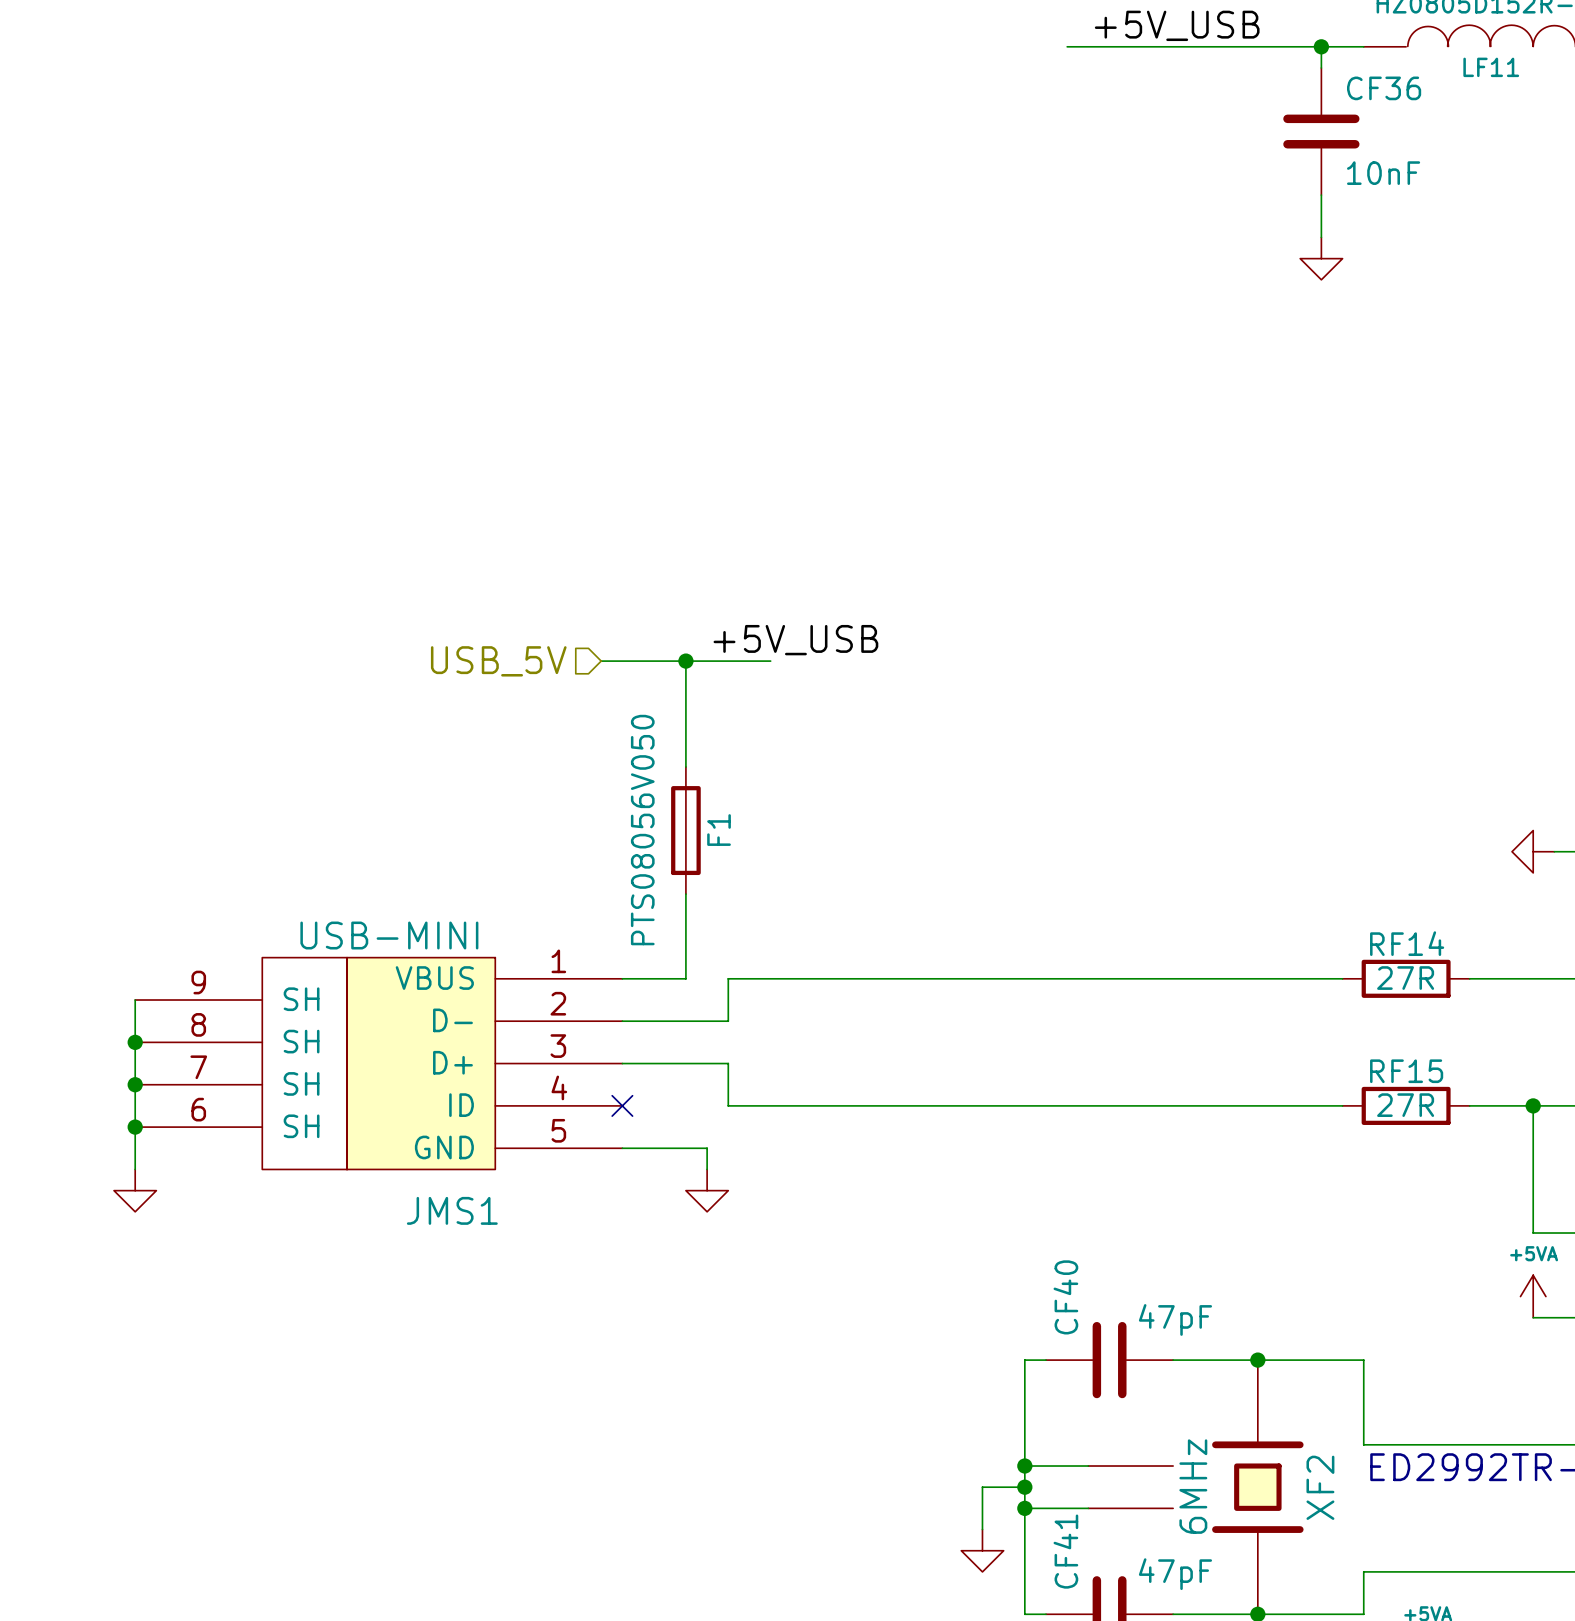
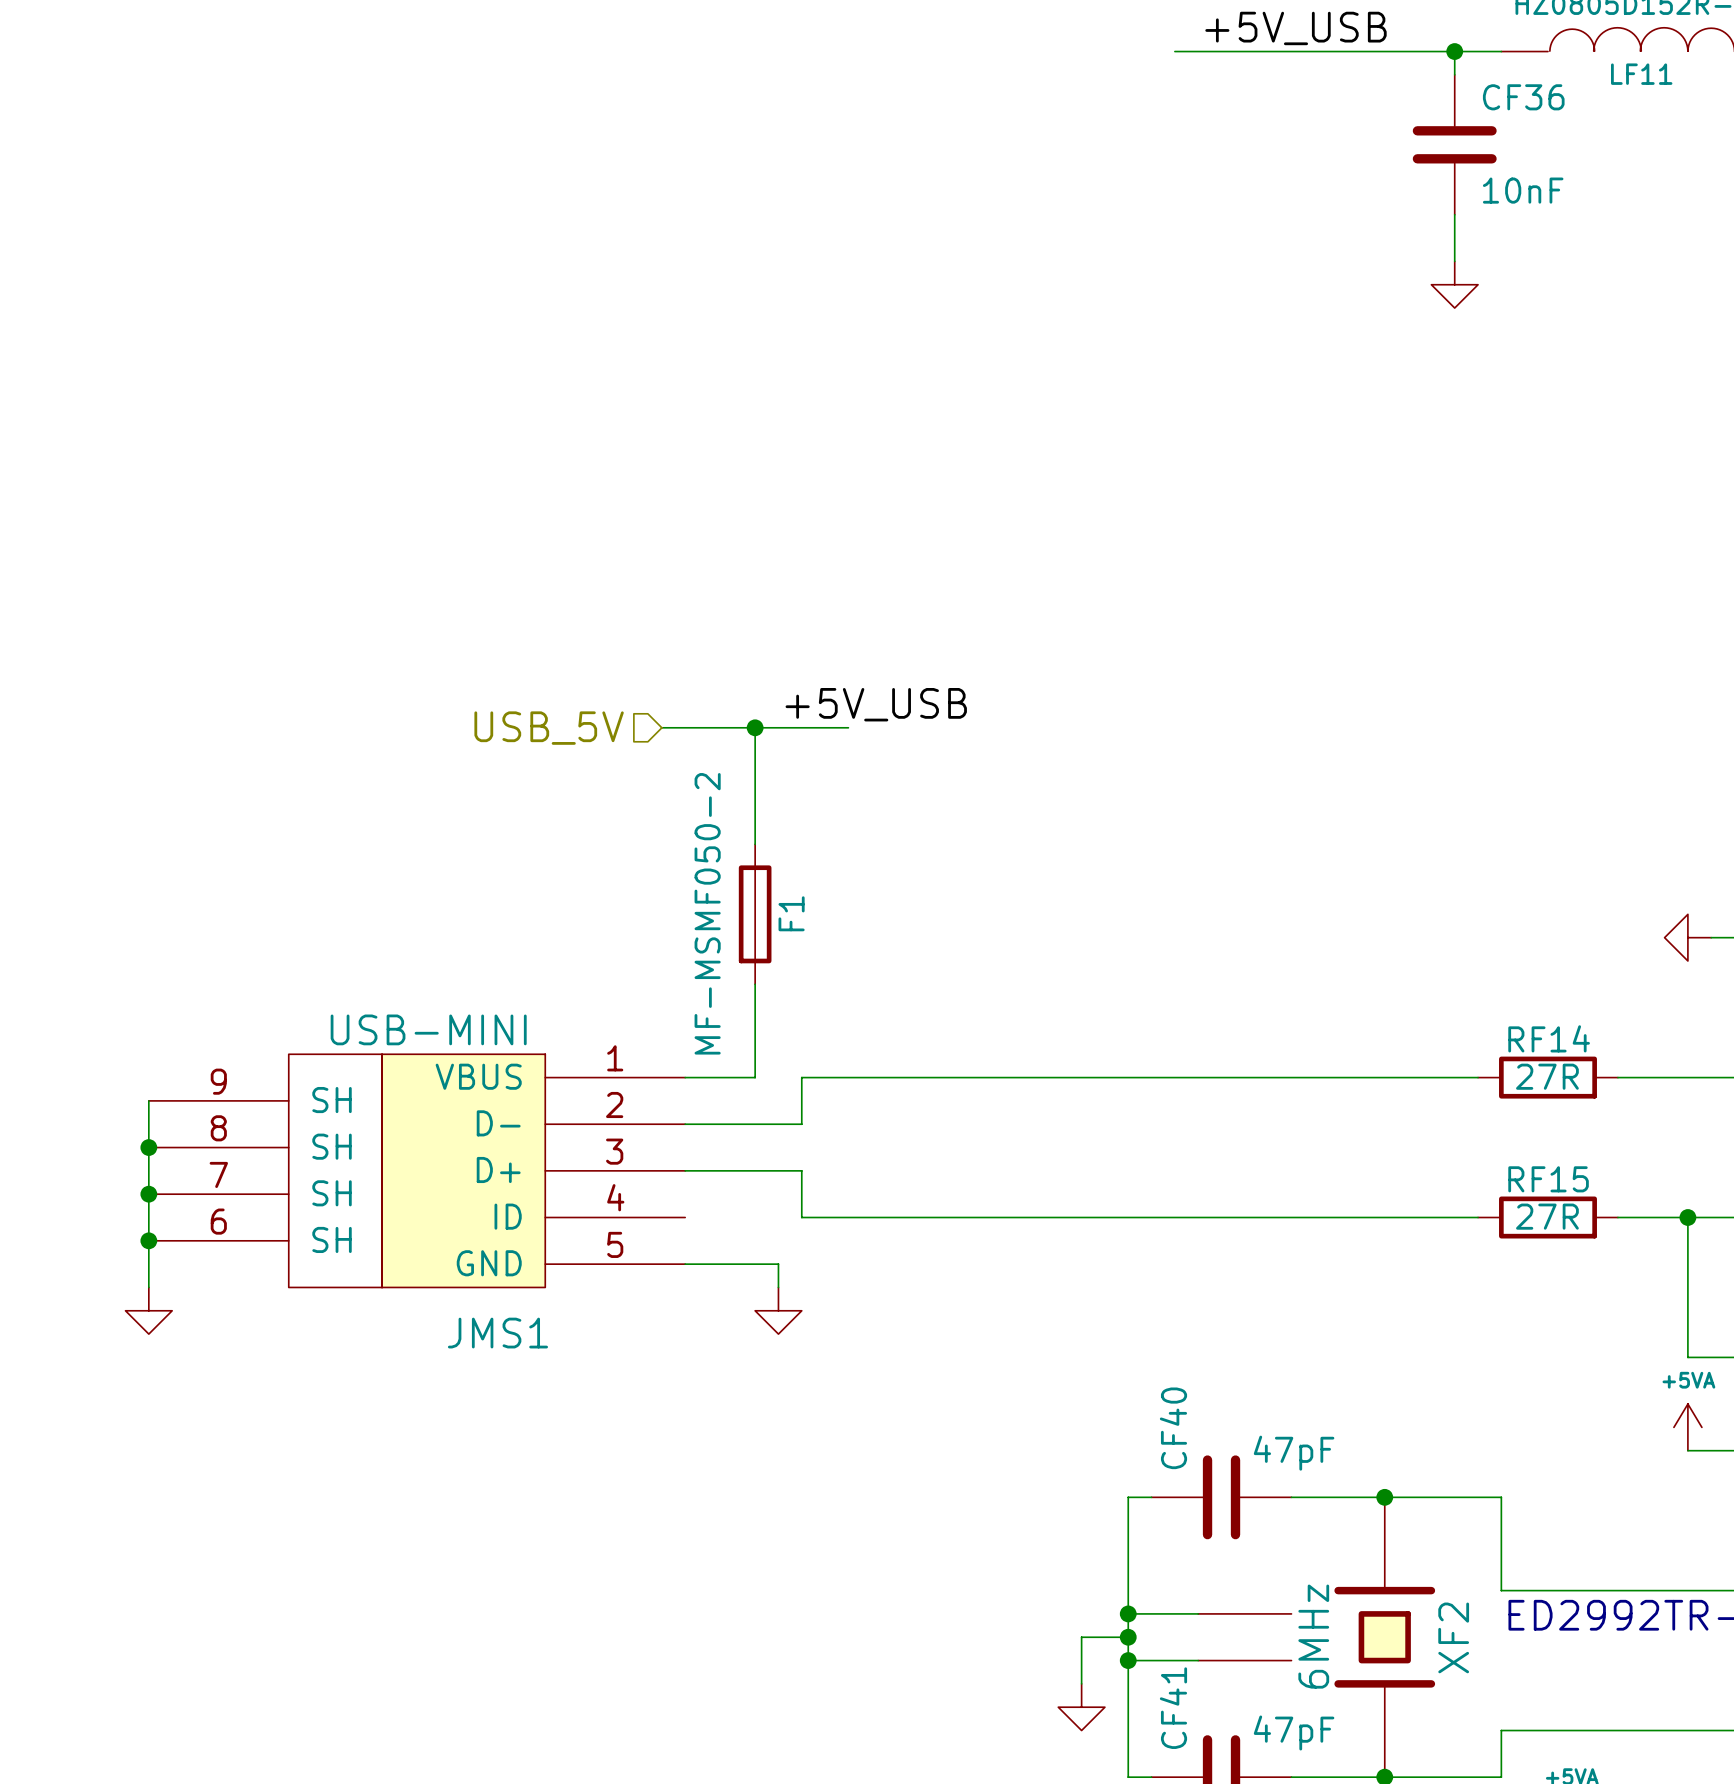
F1 value: PTS08056V050 (642, 830) -> MF-MSMF050-2 (707, 913)
no-connect mark: (622, 1105) -> none

